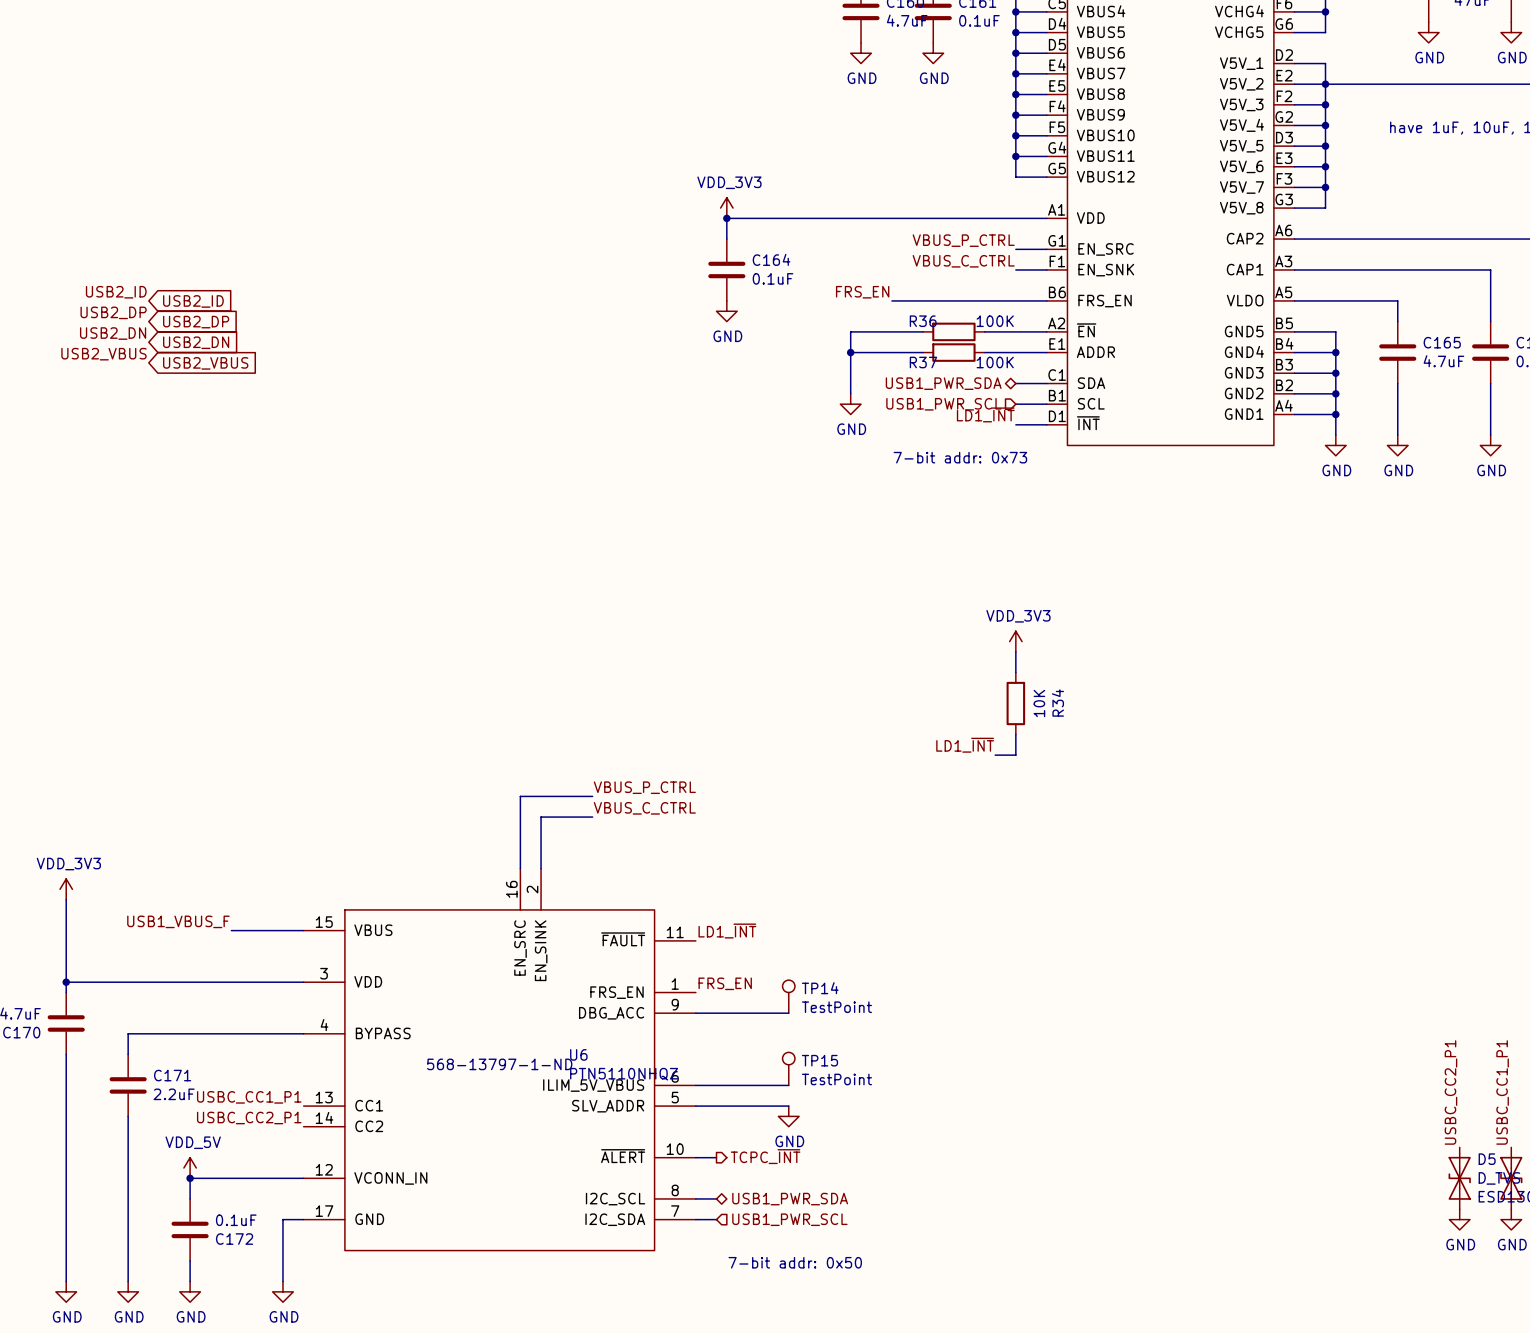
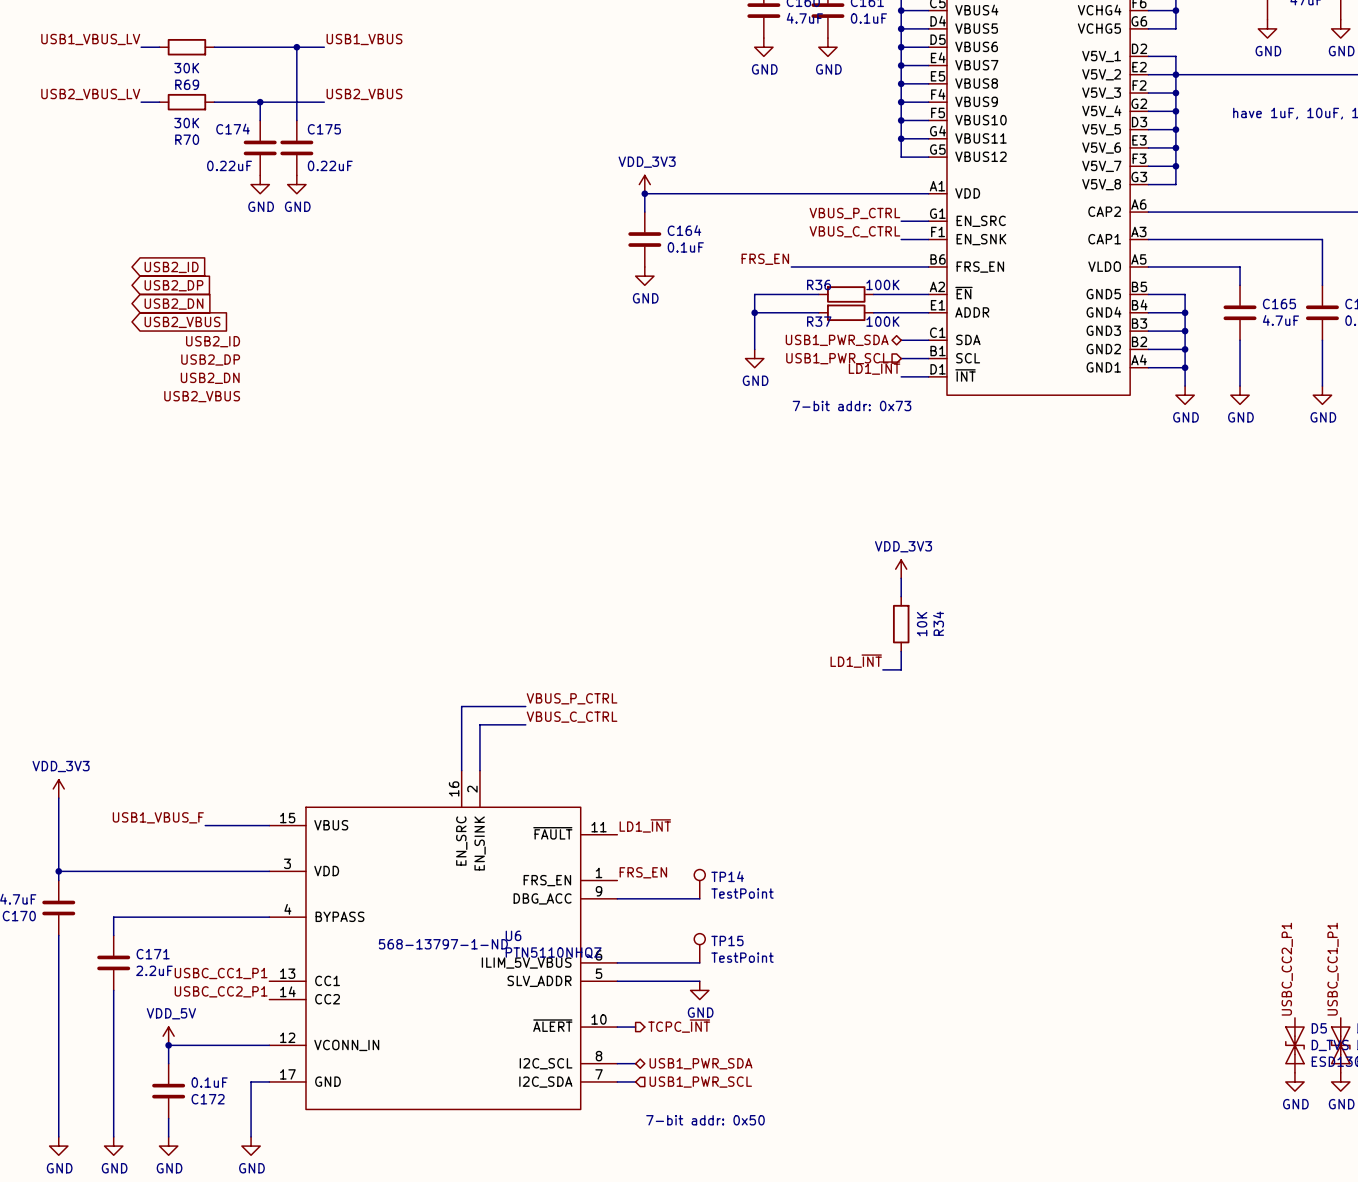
label: none -> USB1_VBUS_LV (90, 39)
label: none -> USB1_VBUS (364, 39)
wire: none -> (141, 47) (159, 47)
R69: none -> 30K (186, 47)
wire: none -> (214, 47) (324, 47)
wire: none -> (296, 47) (296, 120)
junction: none -> (296, 47)
label: none -> USB2_VBUS_LV (90, 94)
label: none -> USB2_VBUS (364, 94)
wire: none -> (141, 102) (159, 102)
R70: none -> 30K (186, 102)
wire: none -> (214, 102) (324, 102)
wire: none -> (260, 102) (260, 120)
junction: none -> (260, 102)
C174: none -> 0.22uF (260, 147)
C175: none -> 0.22uF (296, 147)
power symbol: none -> GND (260, 184)
power symbol: none -> GND (296, 184)
label position: USB2_ID (116, 292) -> USB2_ID (213, 341)
label position: USB2_DP (113, 312) -> USB2_DP (210, 359)
label position: USB2_DN (113, 333) -> USB2_DN (210, 378)
label position: USB2_VBUS (103, 354) -> USB2_VBUS (202, 396)

